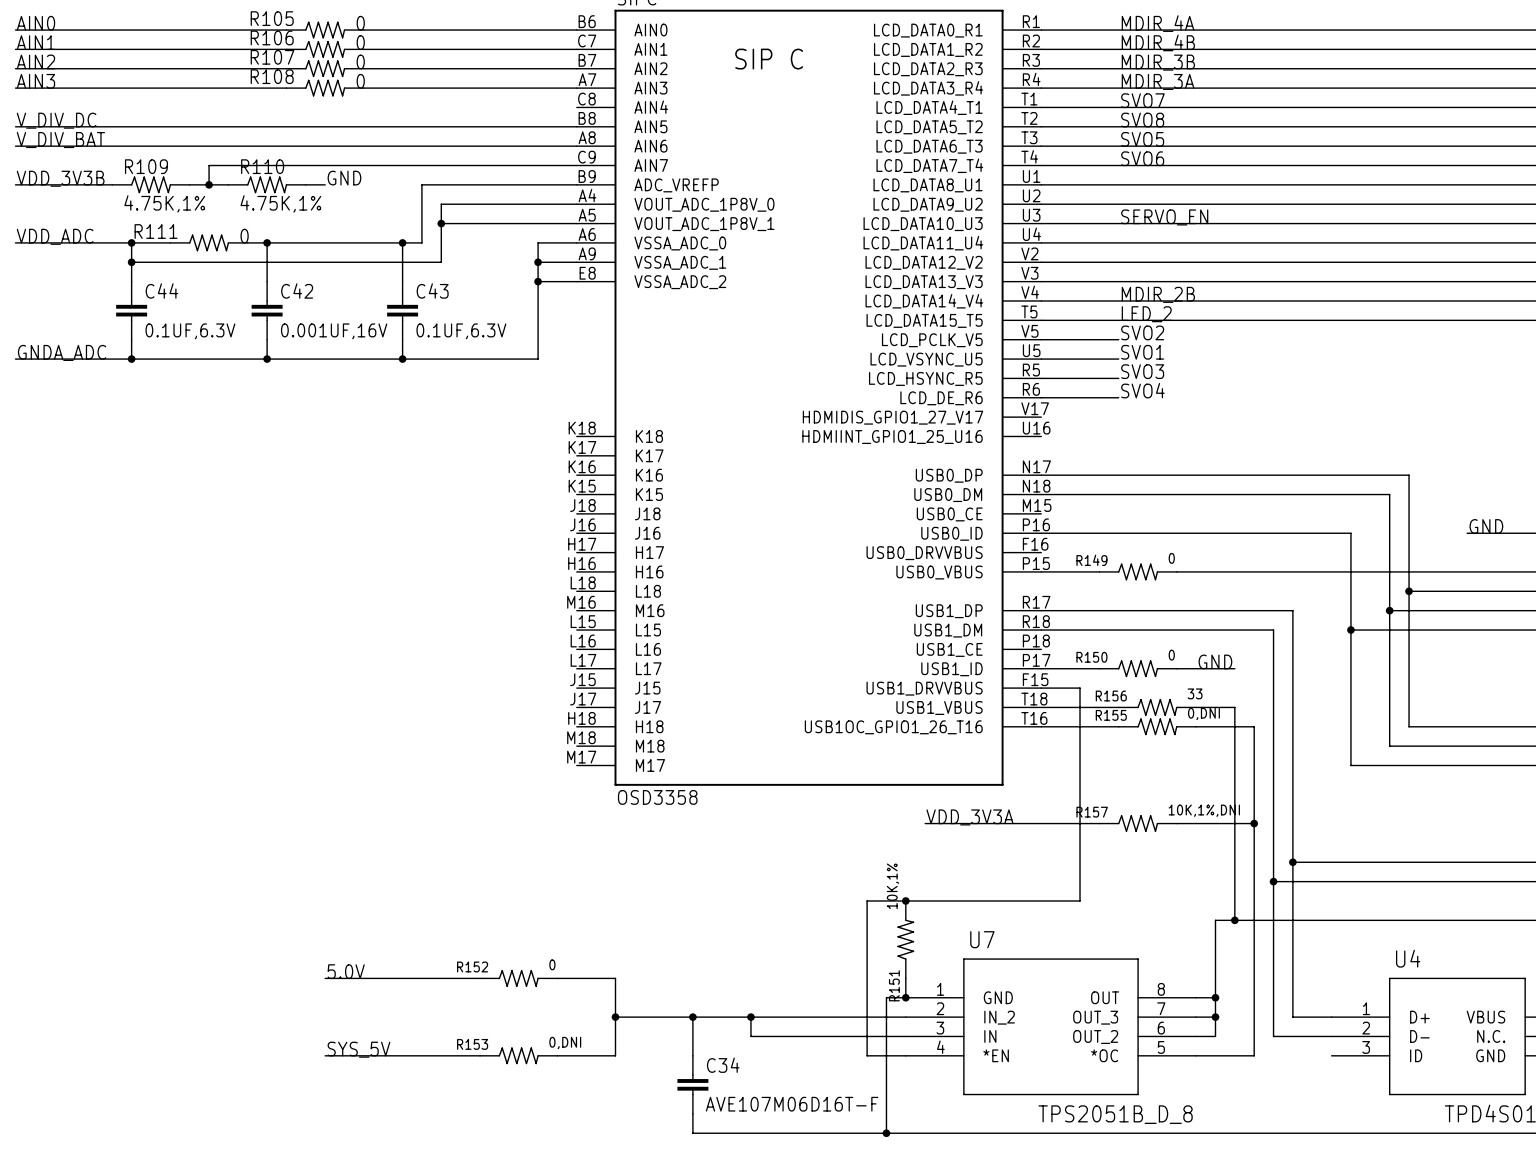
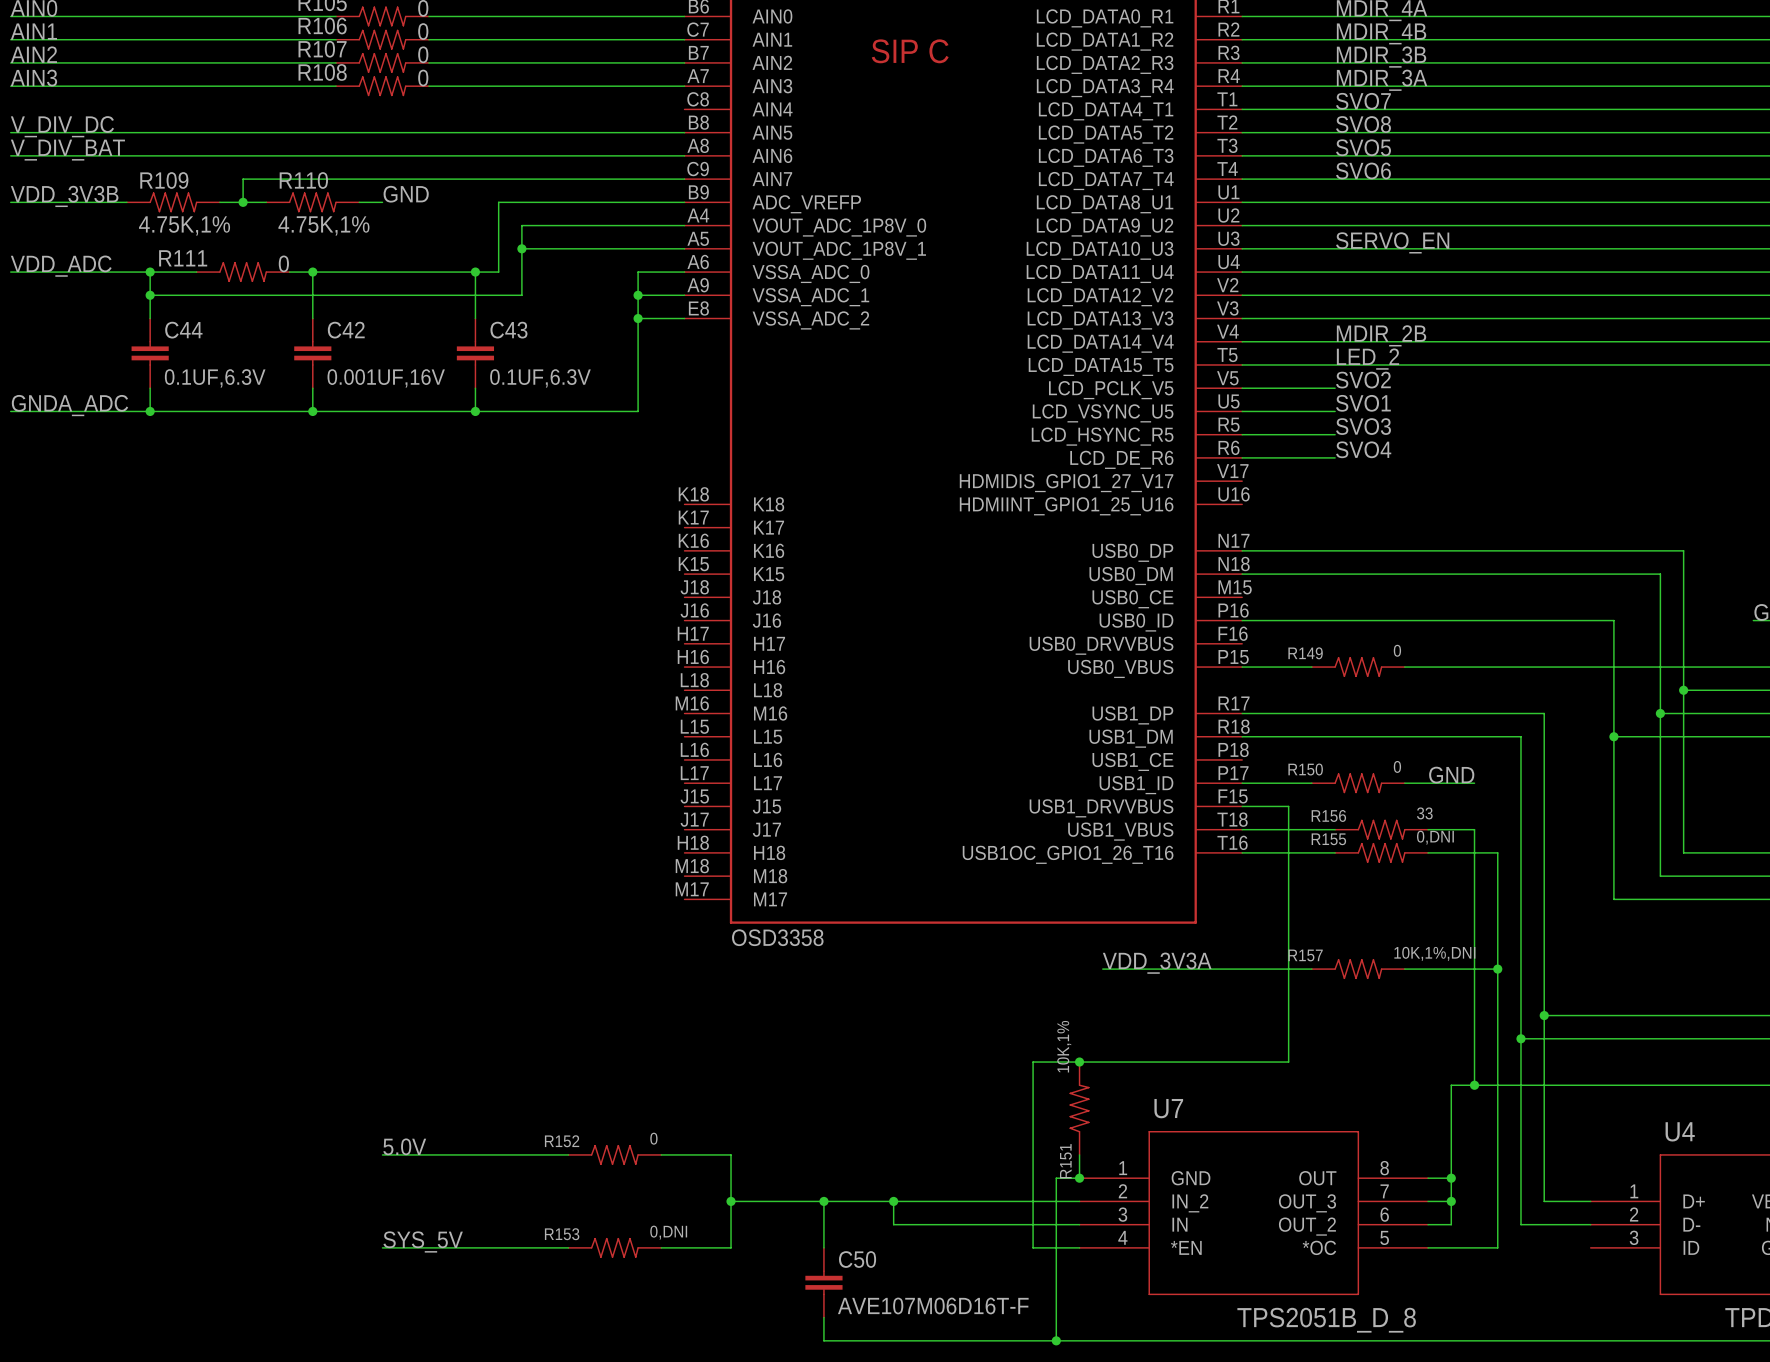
C50 name: none -> C50 (857, 1259)
C50 text: C34 (723, 1065) -> none

